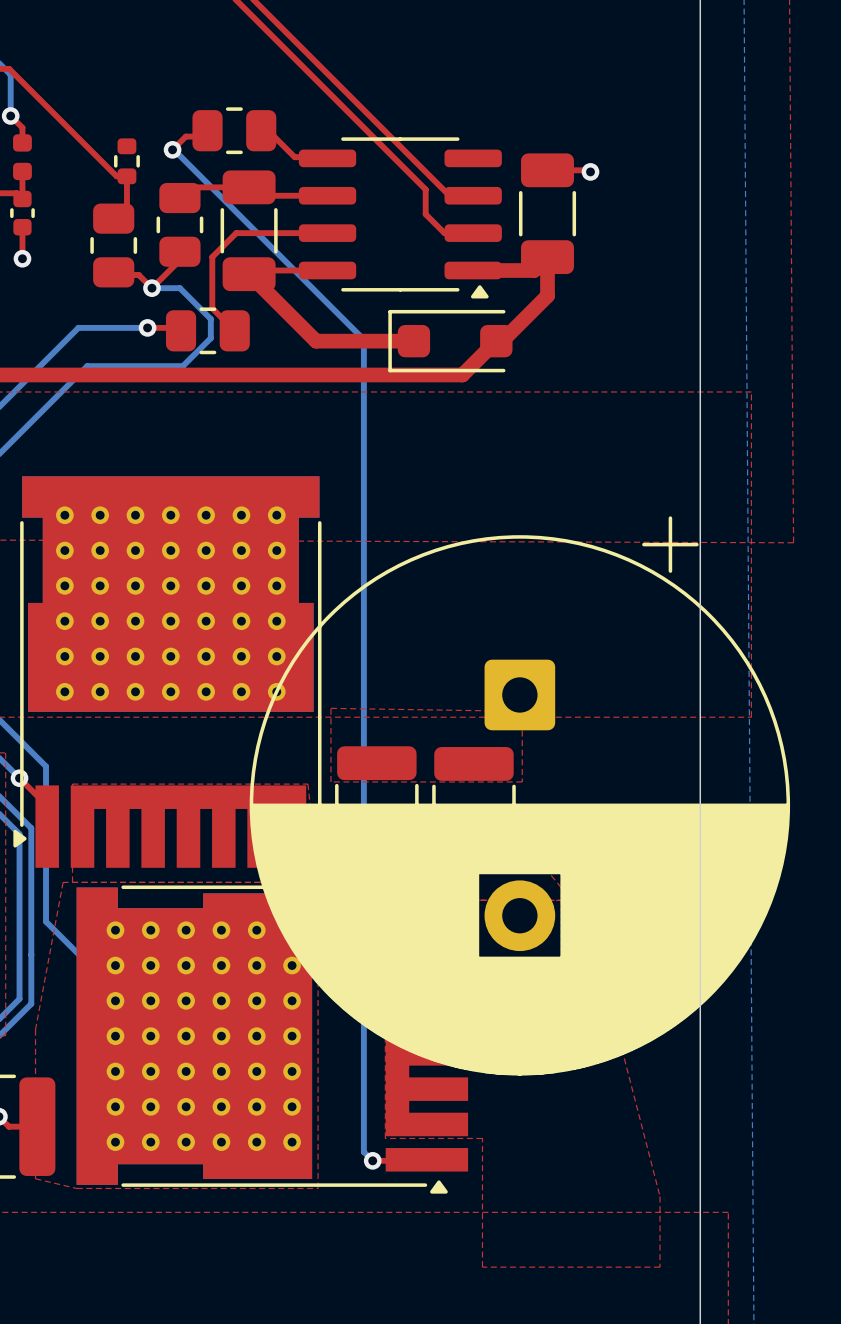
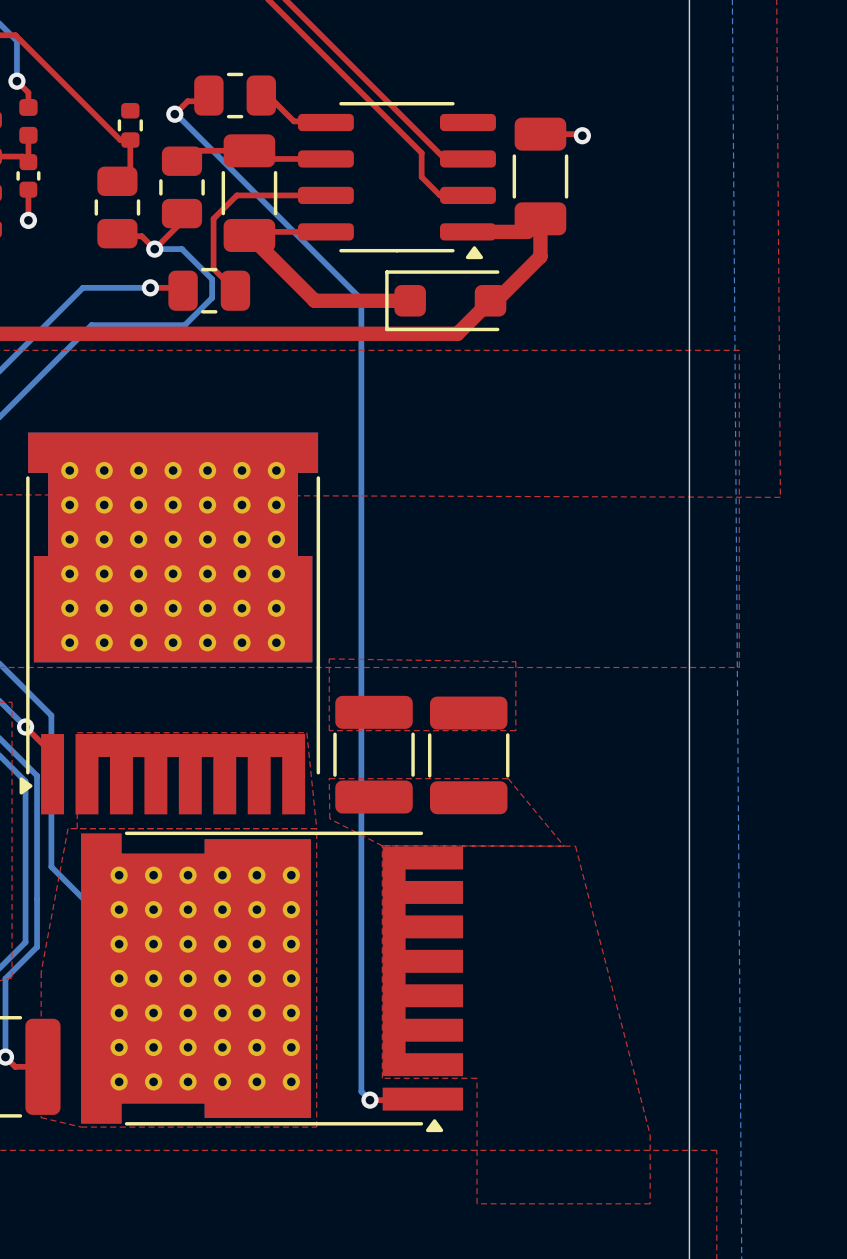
part: (519, 795) -> none

